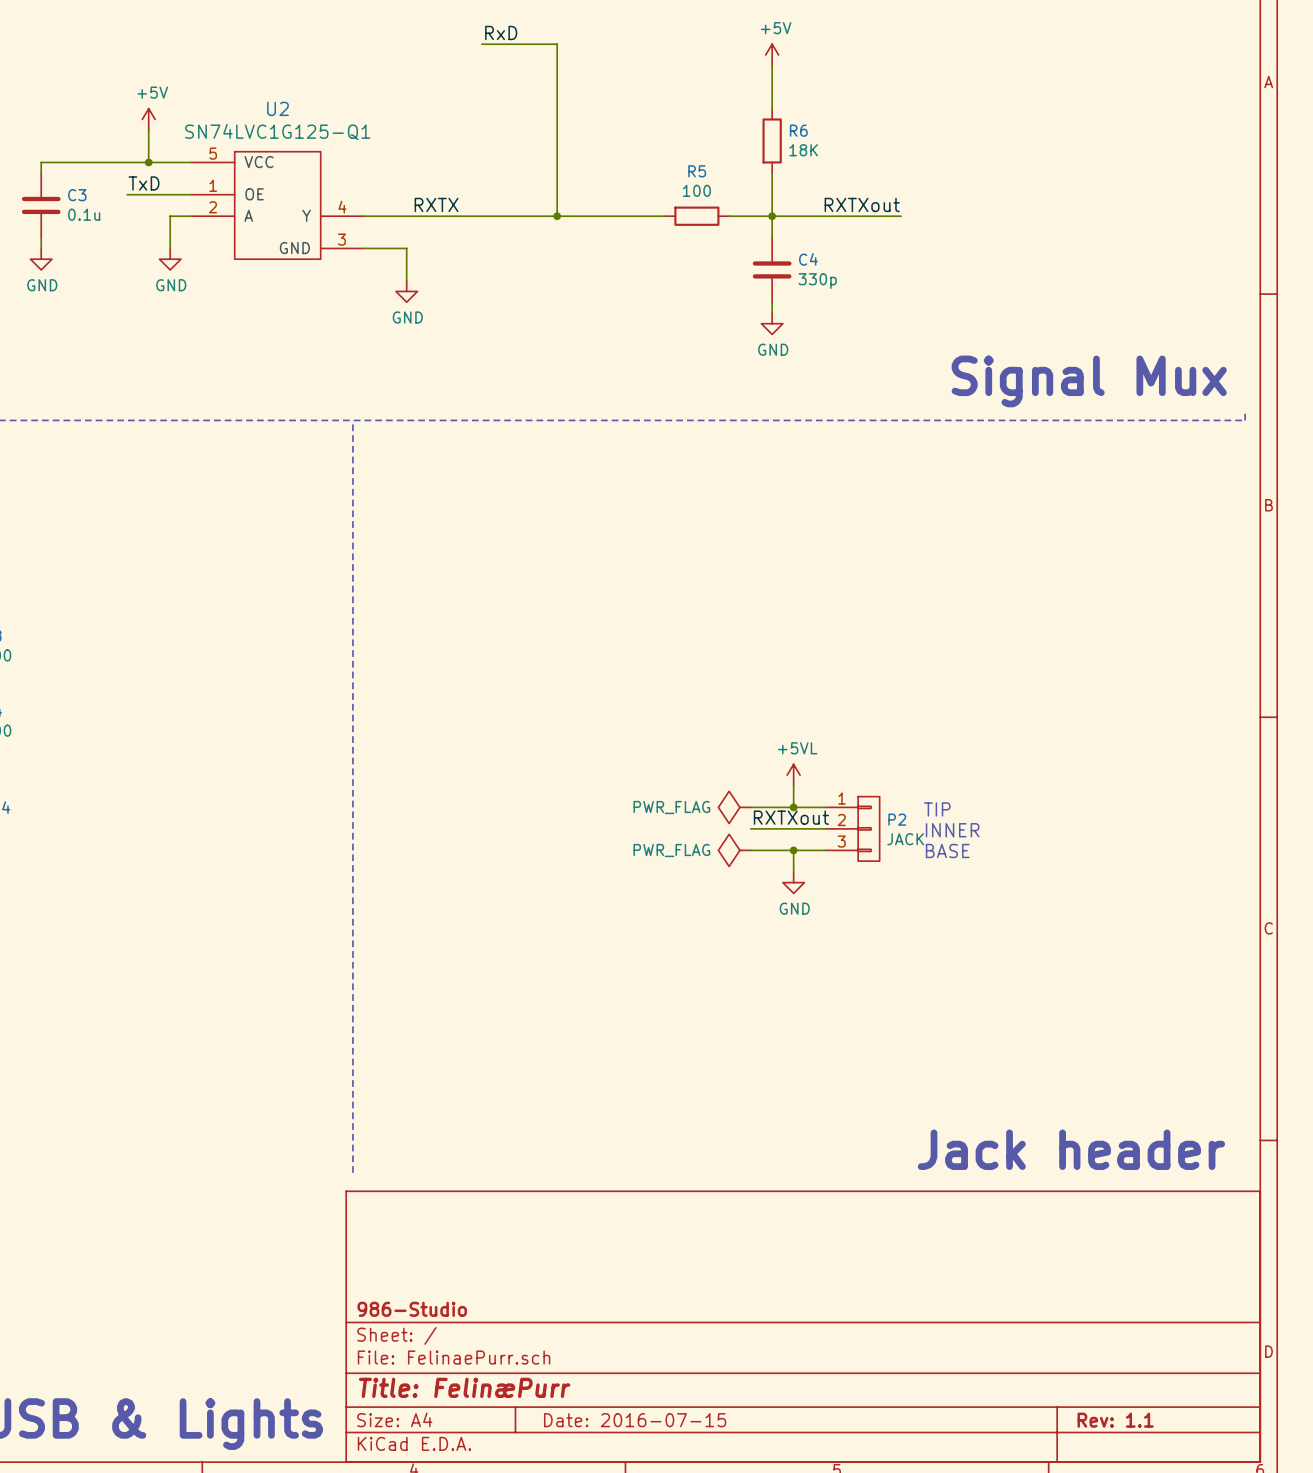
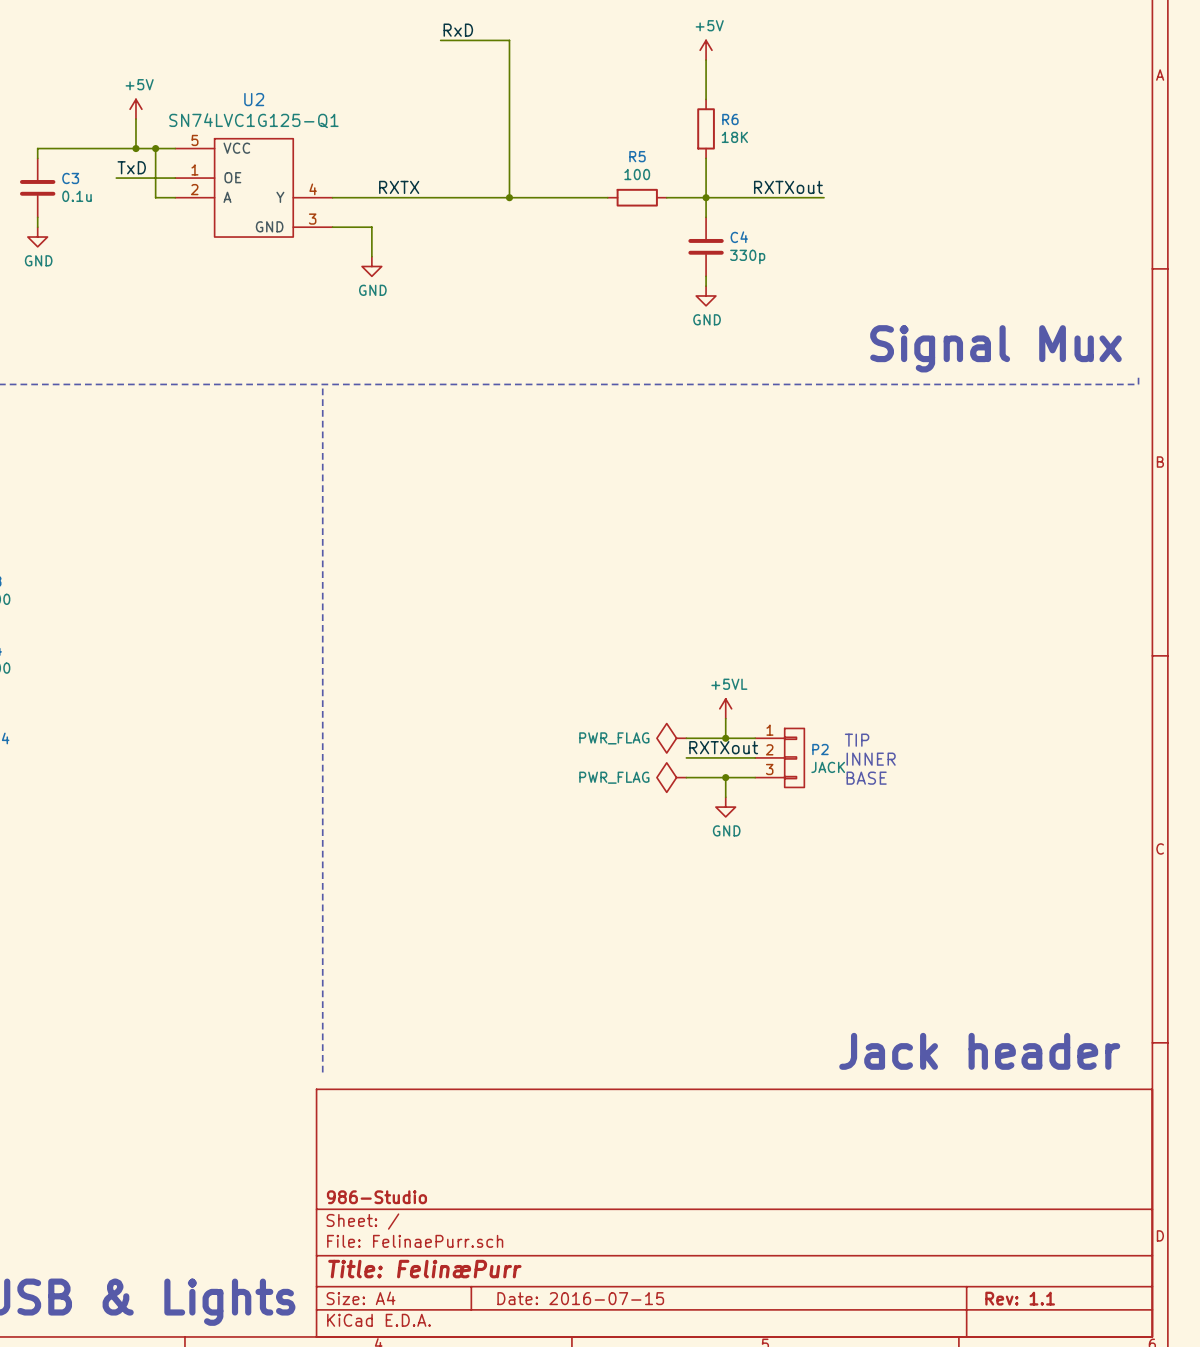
junction: none -> (155, 148)
wire: (170, 216) (170, 248) -> (155, 197) (155, 148)
power symbol: GND (170, 259) -> none

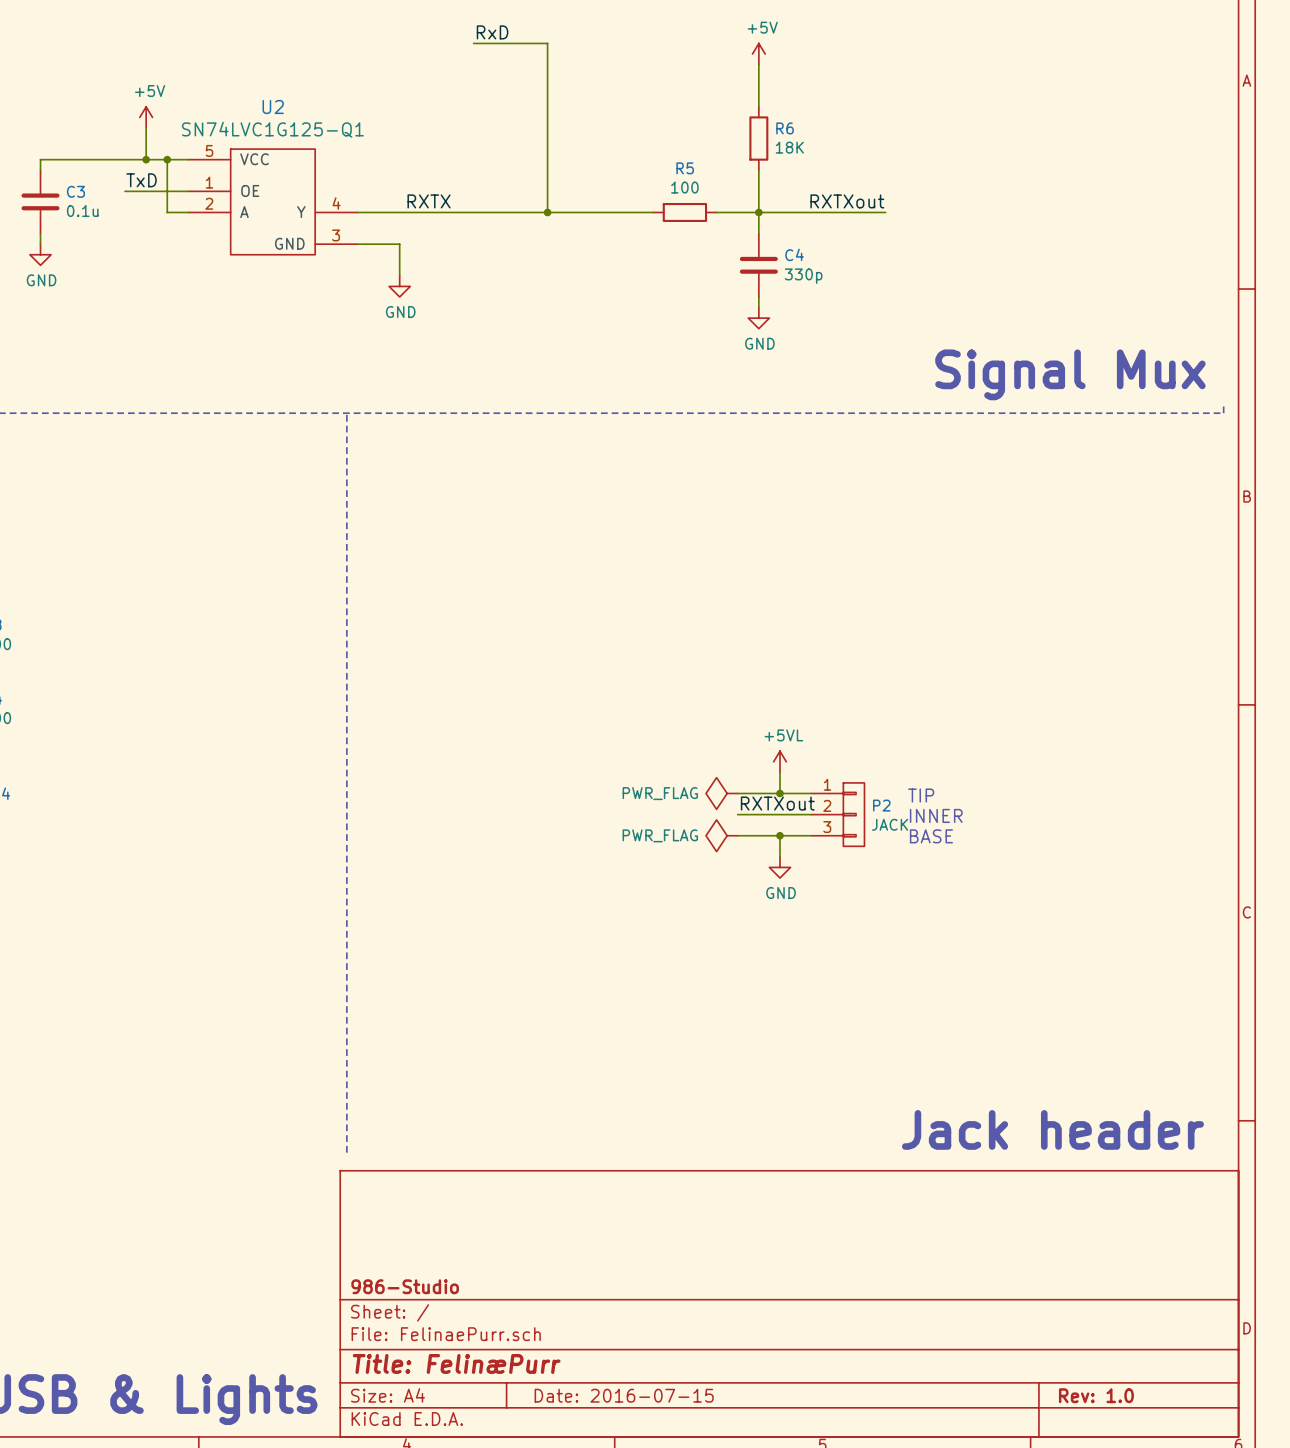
title block: Rev: 1.1 (1020, 1298) -> Rev: 1.0 (1096, 1395)

